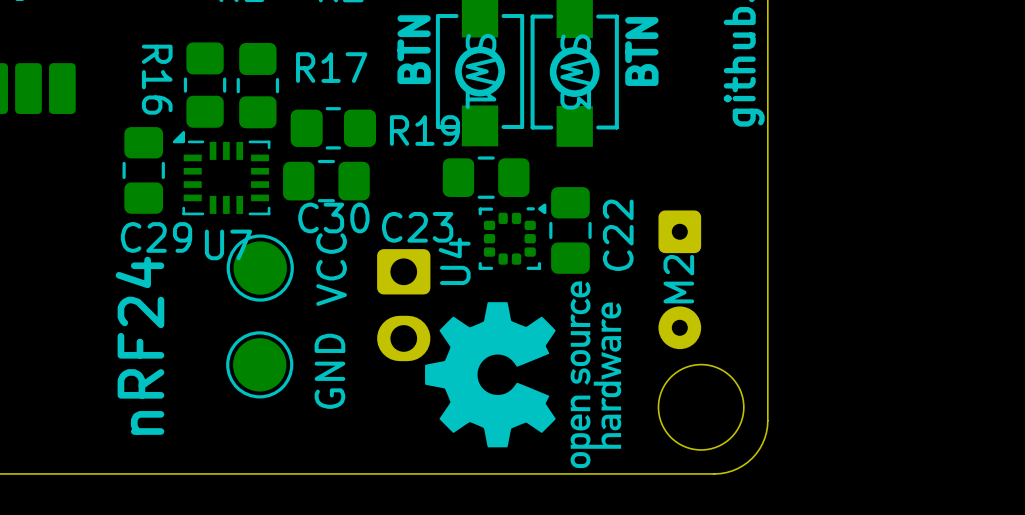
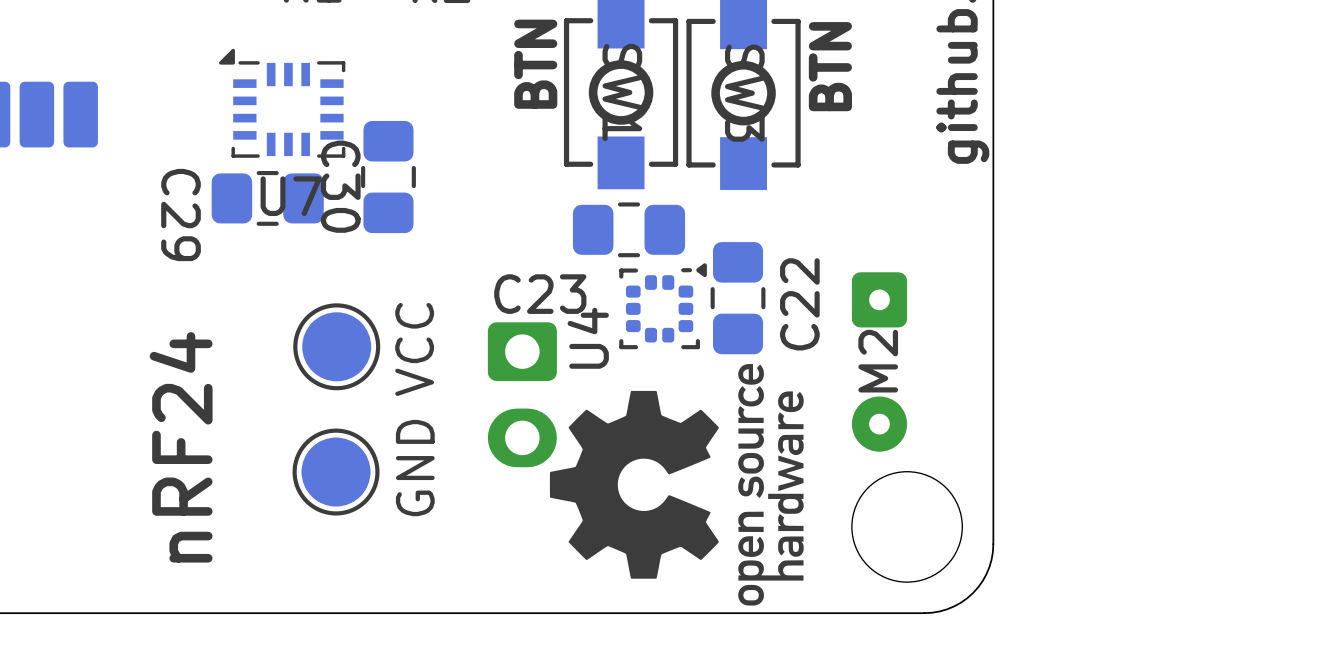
R16: (205, 85) -> none
R17: (257, 85) -> none
R19: (333, 128) -> none
C29 rotation: 0° (143, 170) -> 90° clockwise (267, 198)
C29 position: (143, 170) -> (267, 198)
U7 position: (221, 173) -> (282, 103)
C30 rotation: 0° (326, 181) -> 90° clockwise (388, 177)
VCC name: VCC (331, 269) -> none
text: none -> VCC (414, 349)
text: none -> GND (415, 468)
GND name: GND (329, 371) -> none

